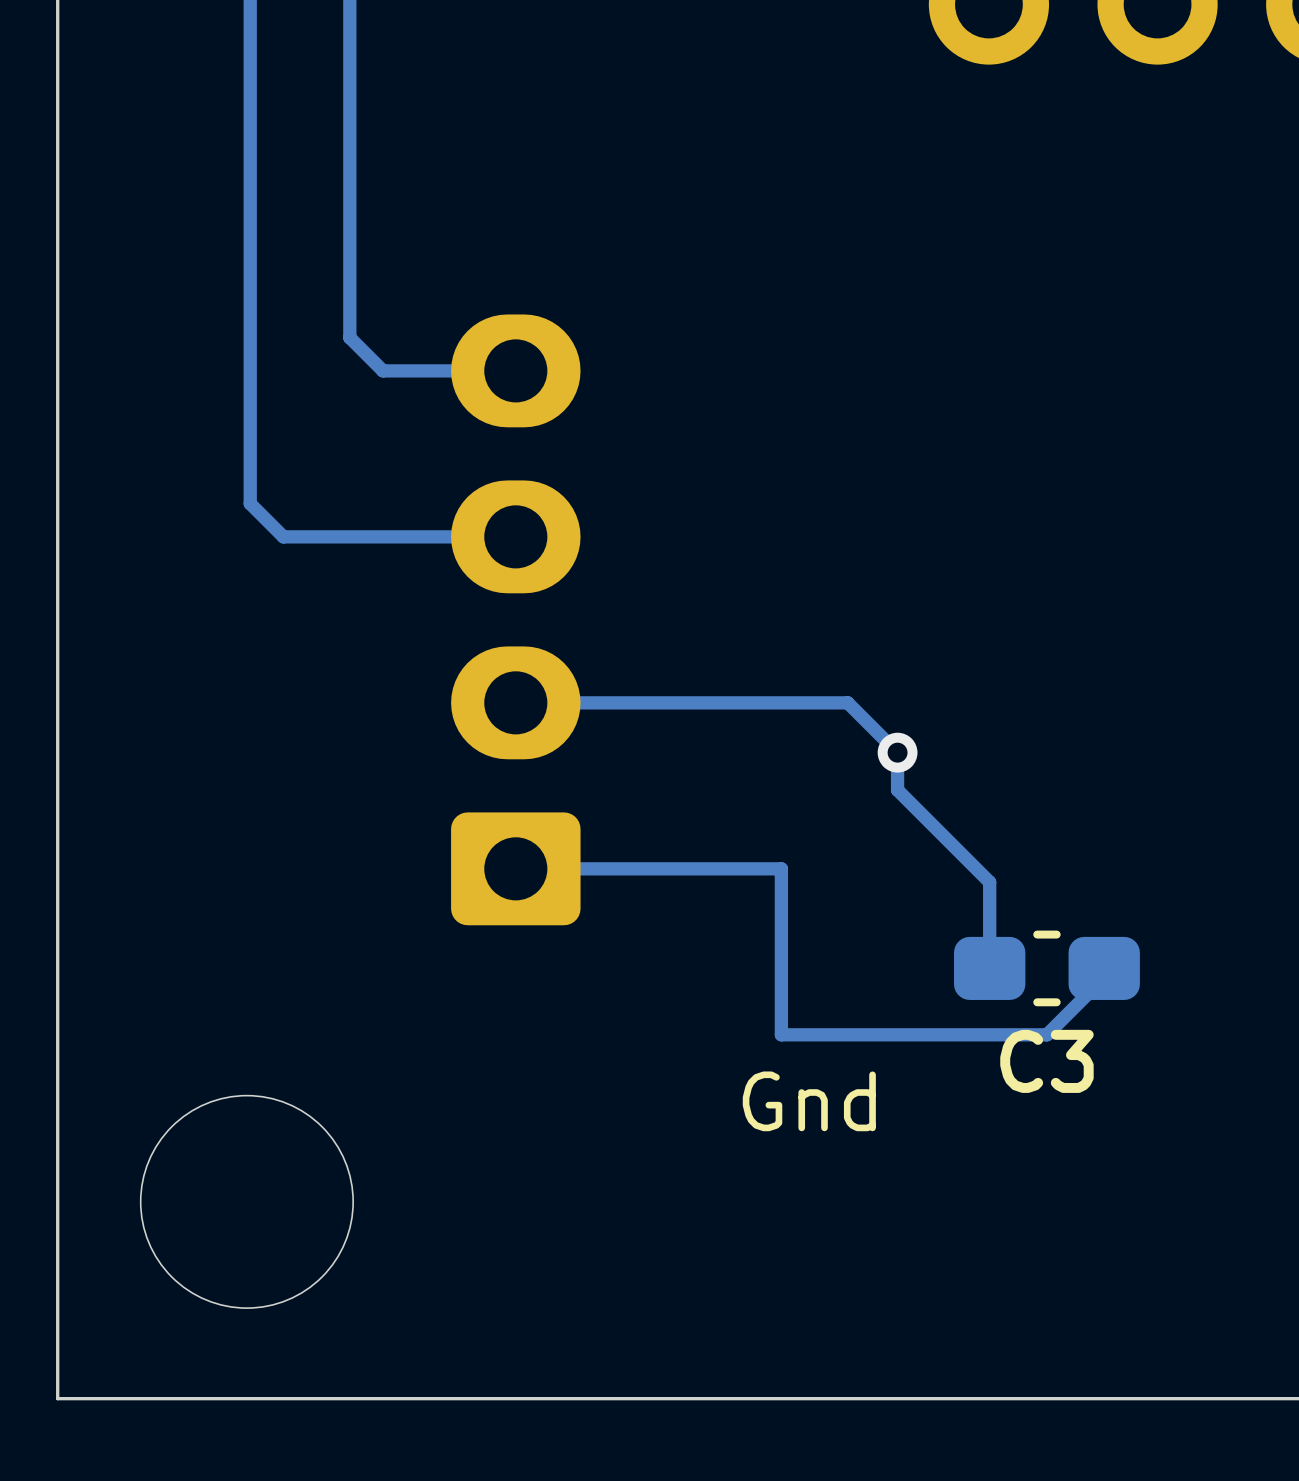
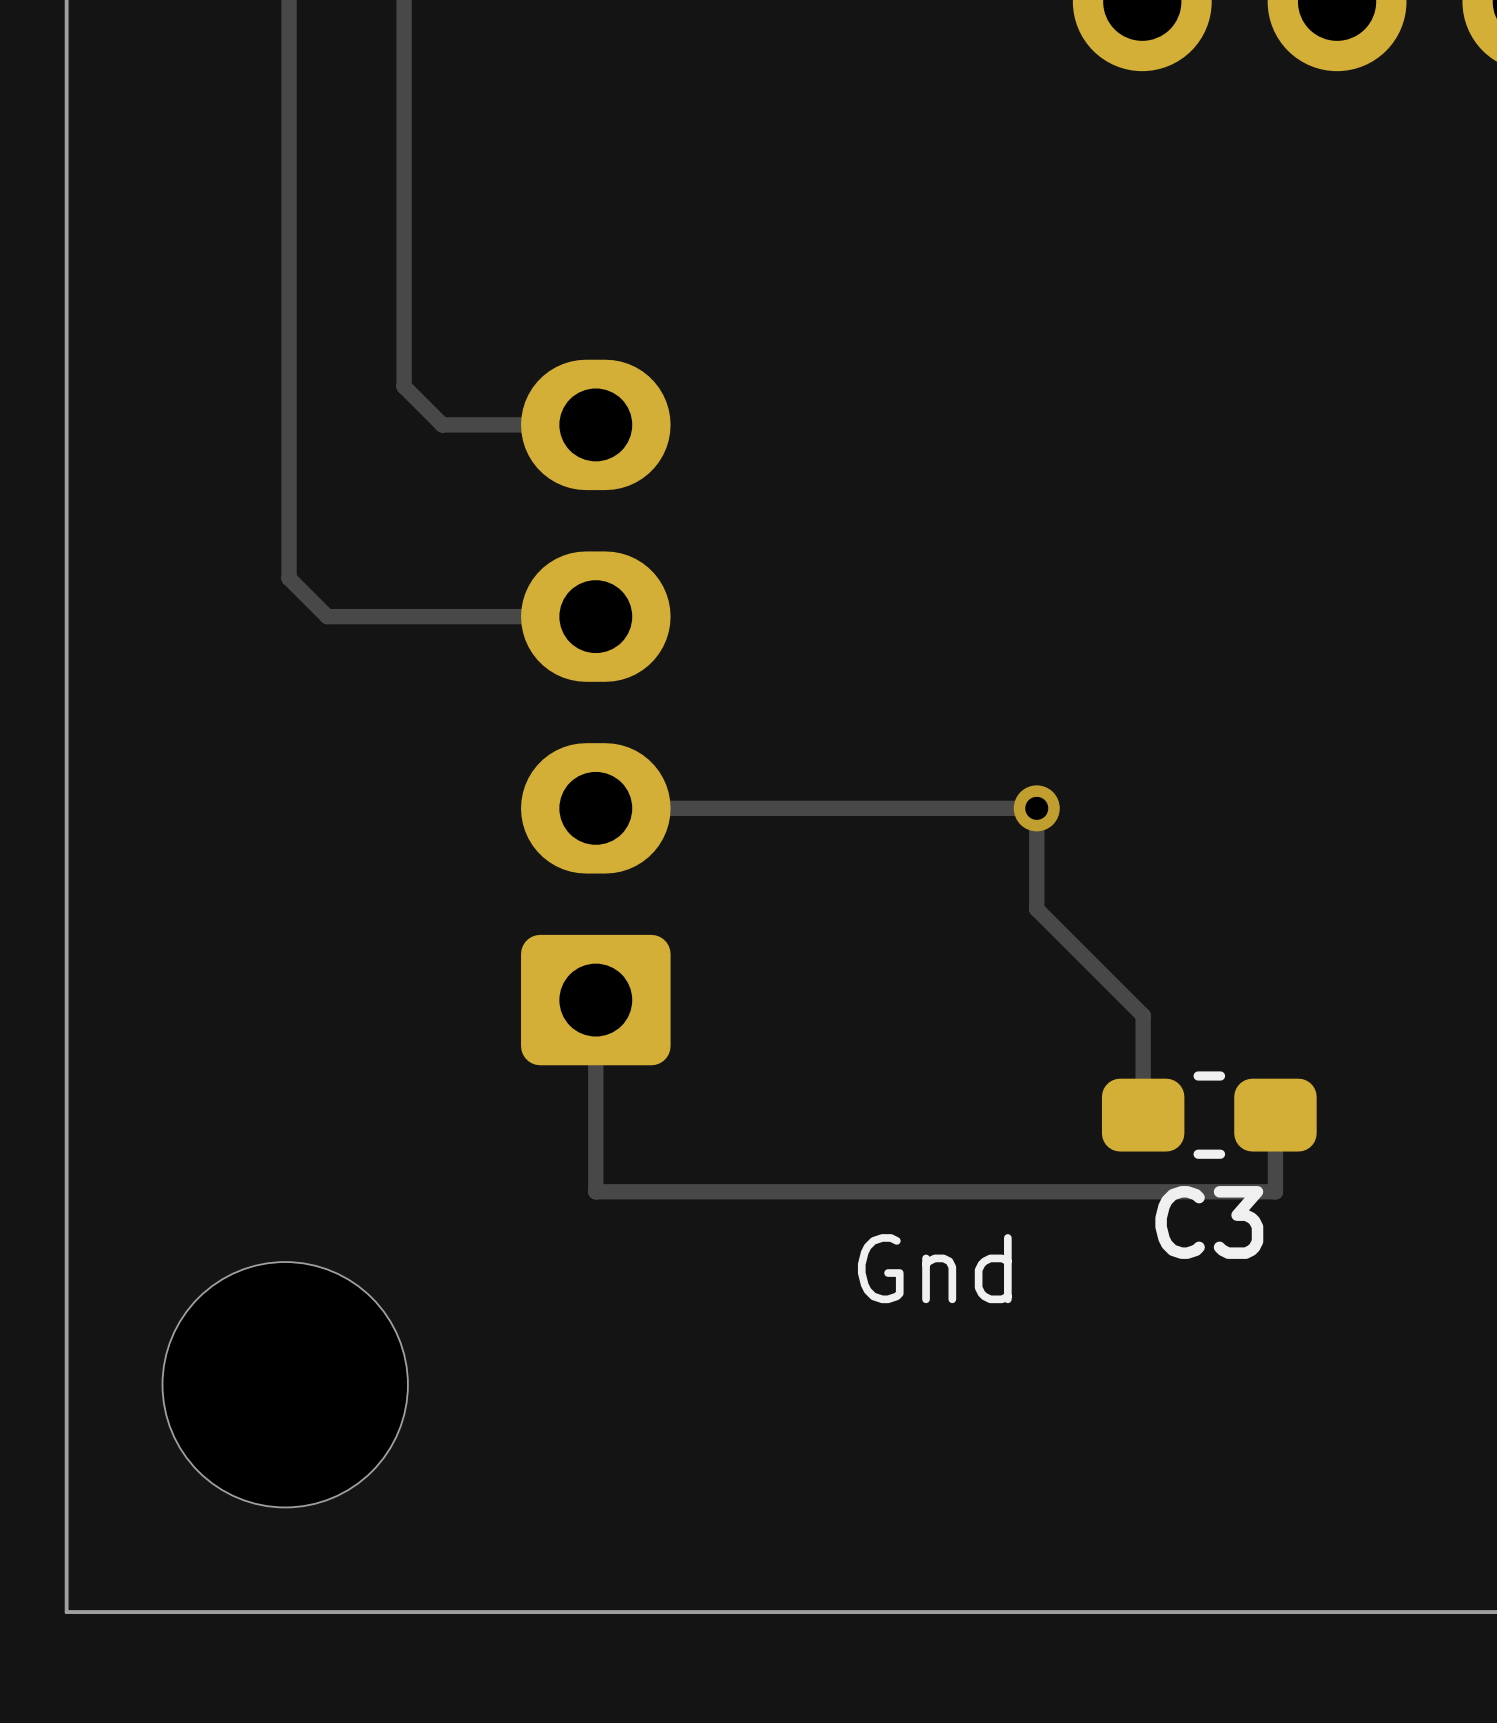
track: (847, 702) (897, 752) -> (979, 808) (1036, 808) (1036, 865)
via position: (897, 752) -> (1036, 808)
track: (515, 868) (781, 868) (781, 1034) -> (595, 1000) (595, 1191) (902, 1191)
track: (1104, 977) (1046, 1034) -> (1275, 1125) (1275, 1191) (1209, 1191)

